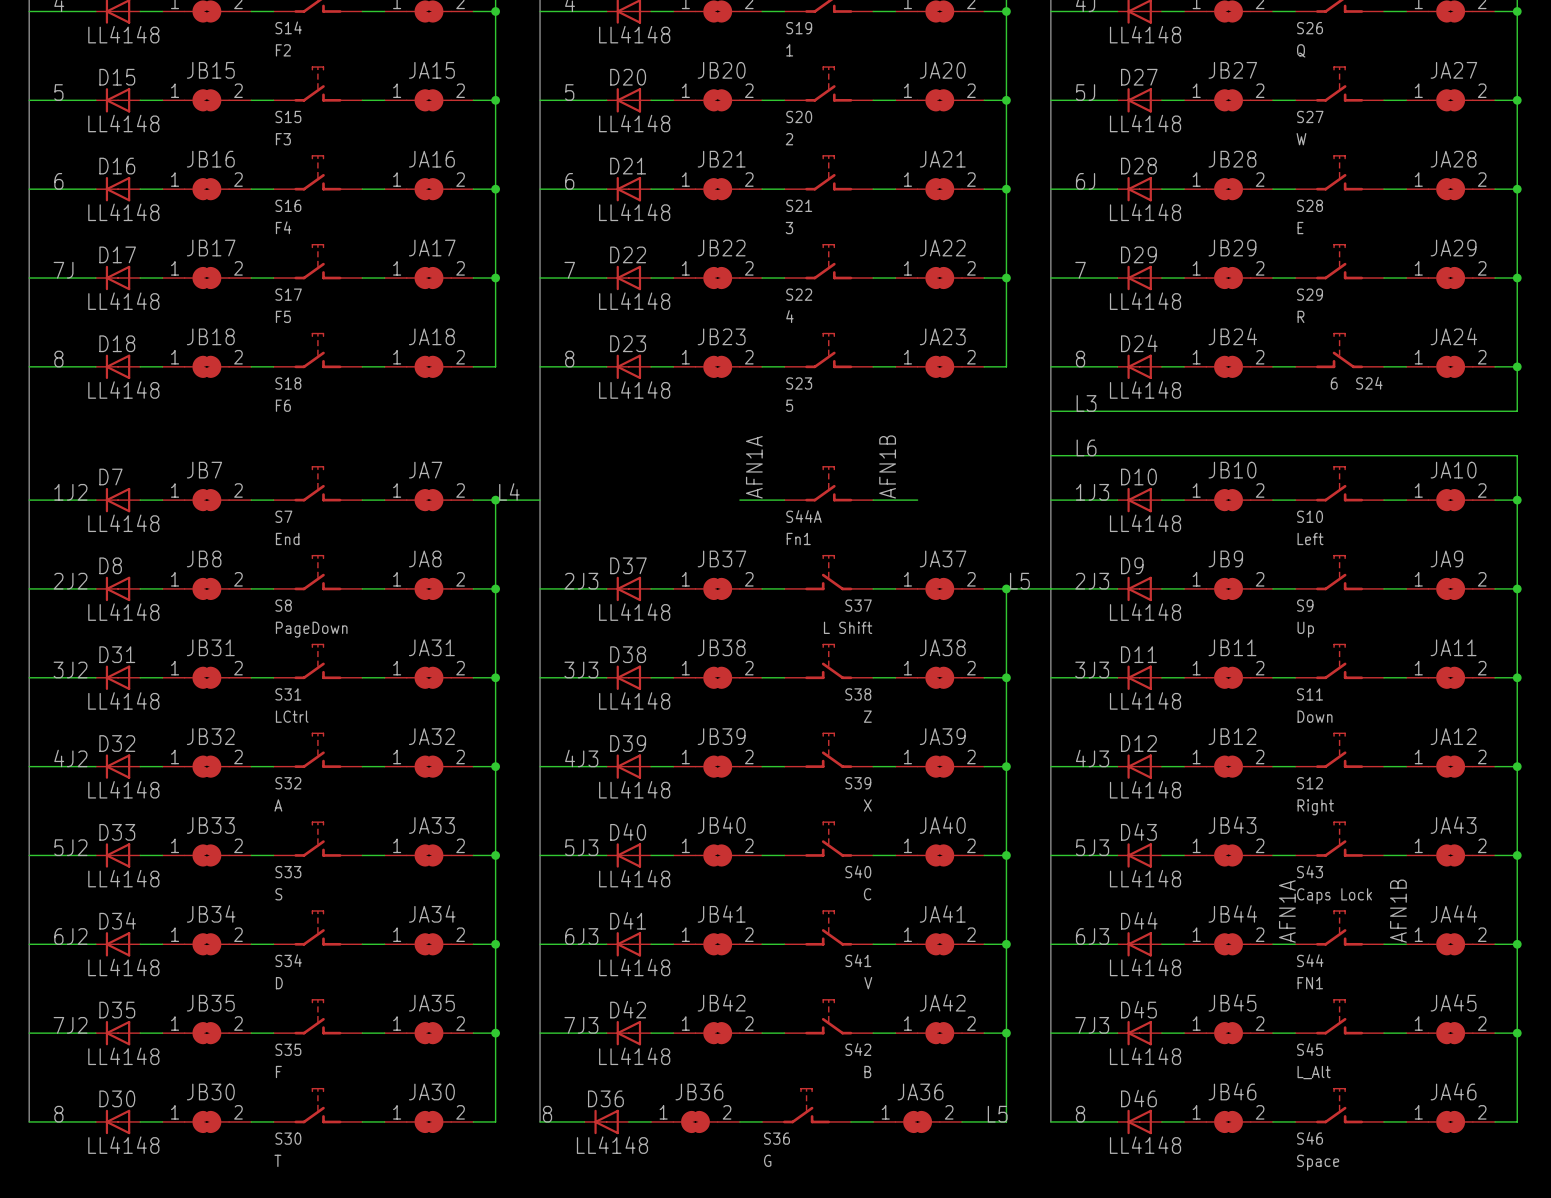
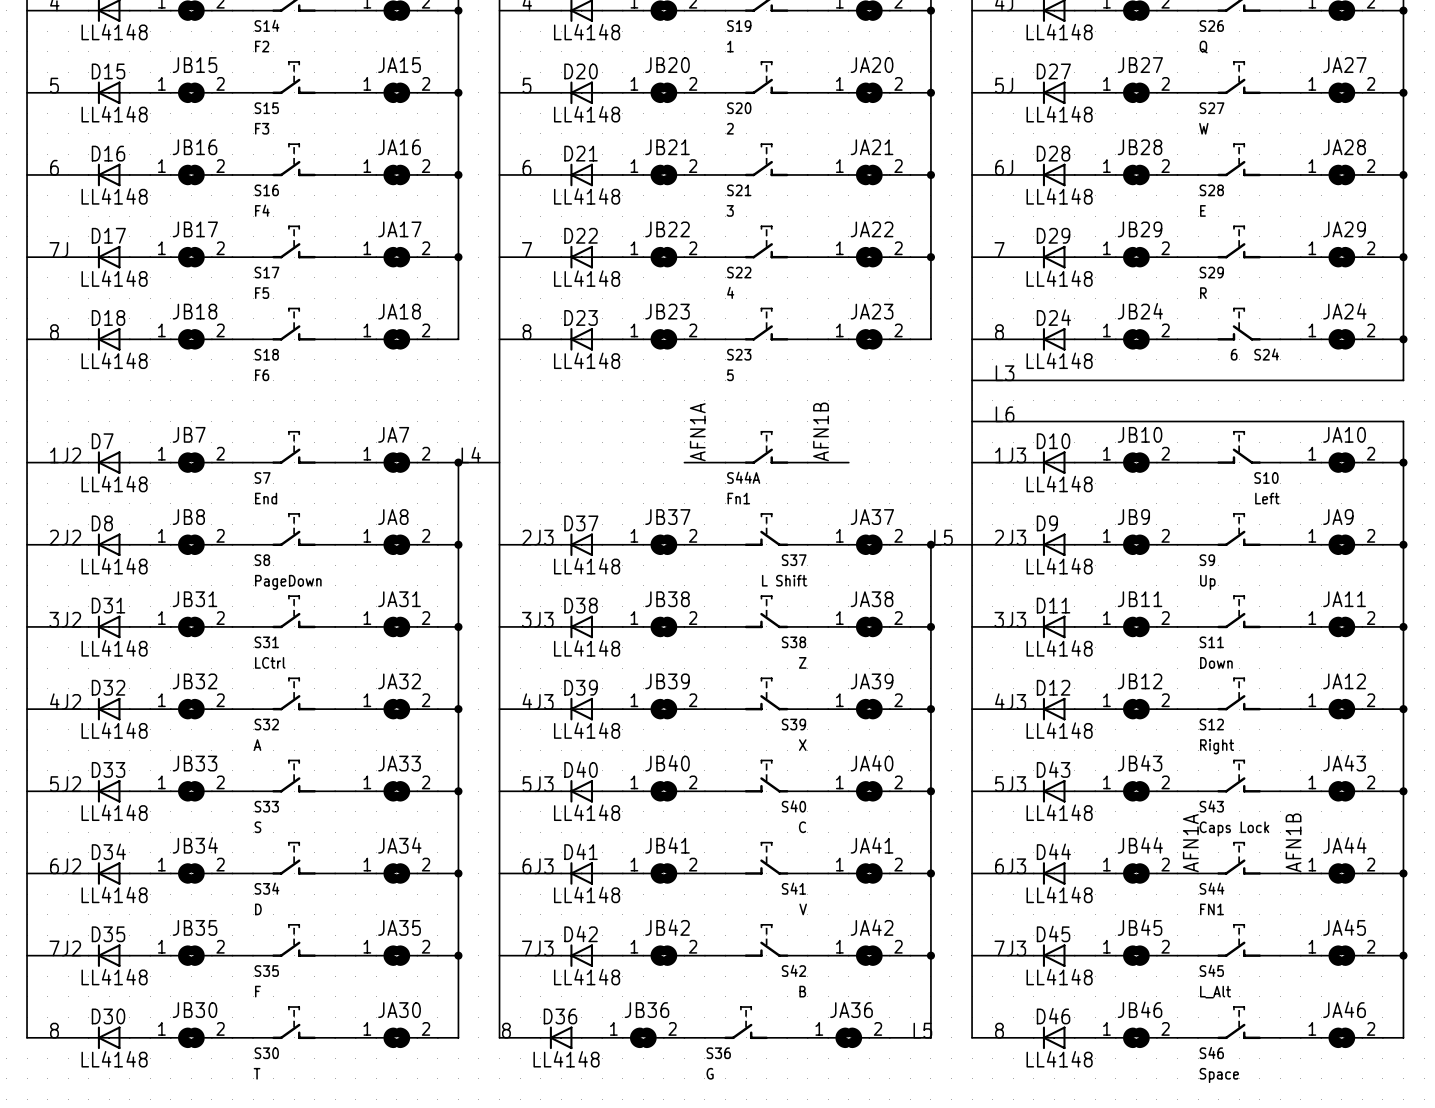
S10 flip: as is (1339, 483) -> left-right (1239, 447)

